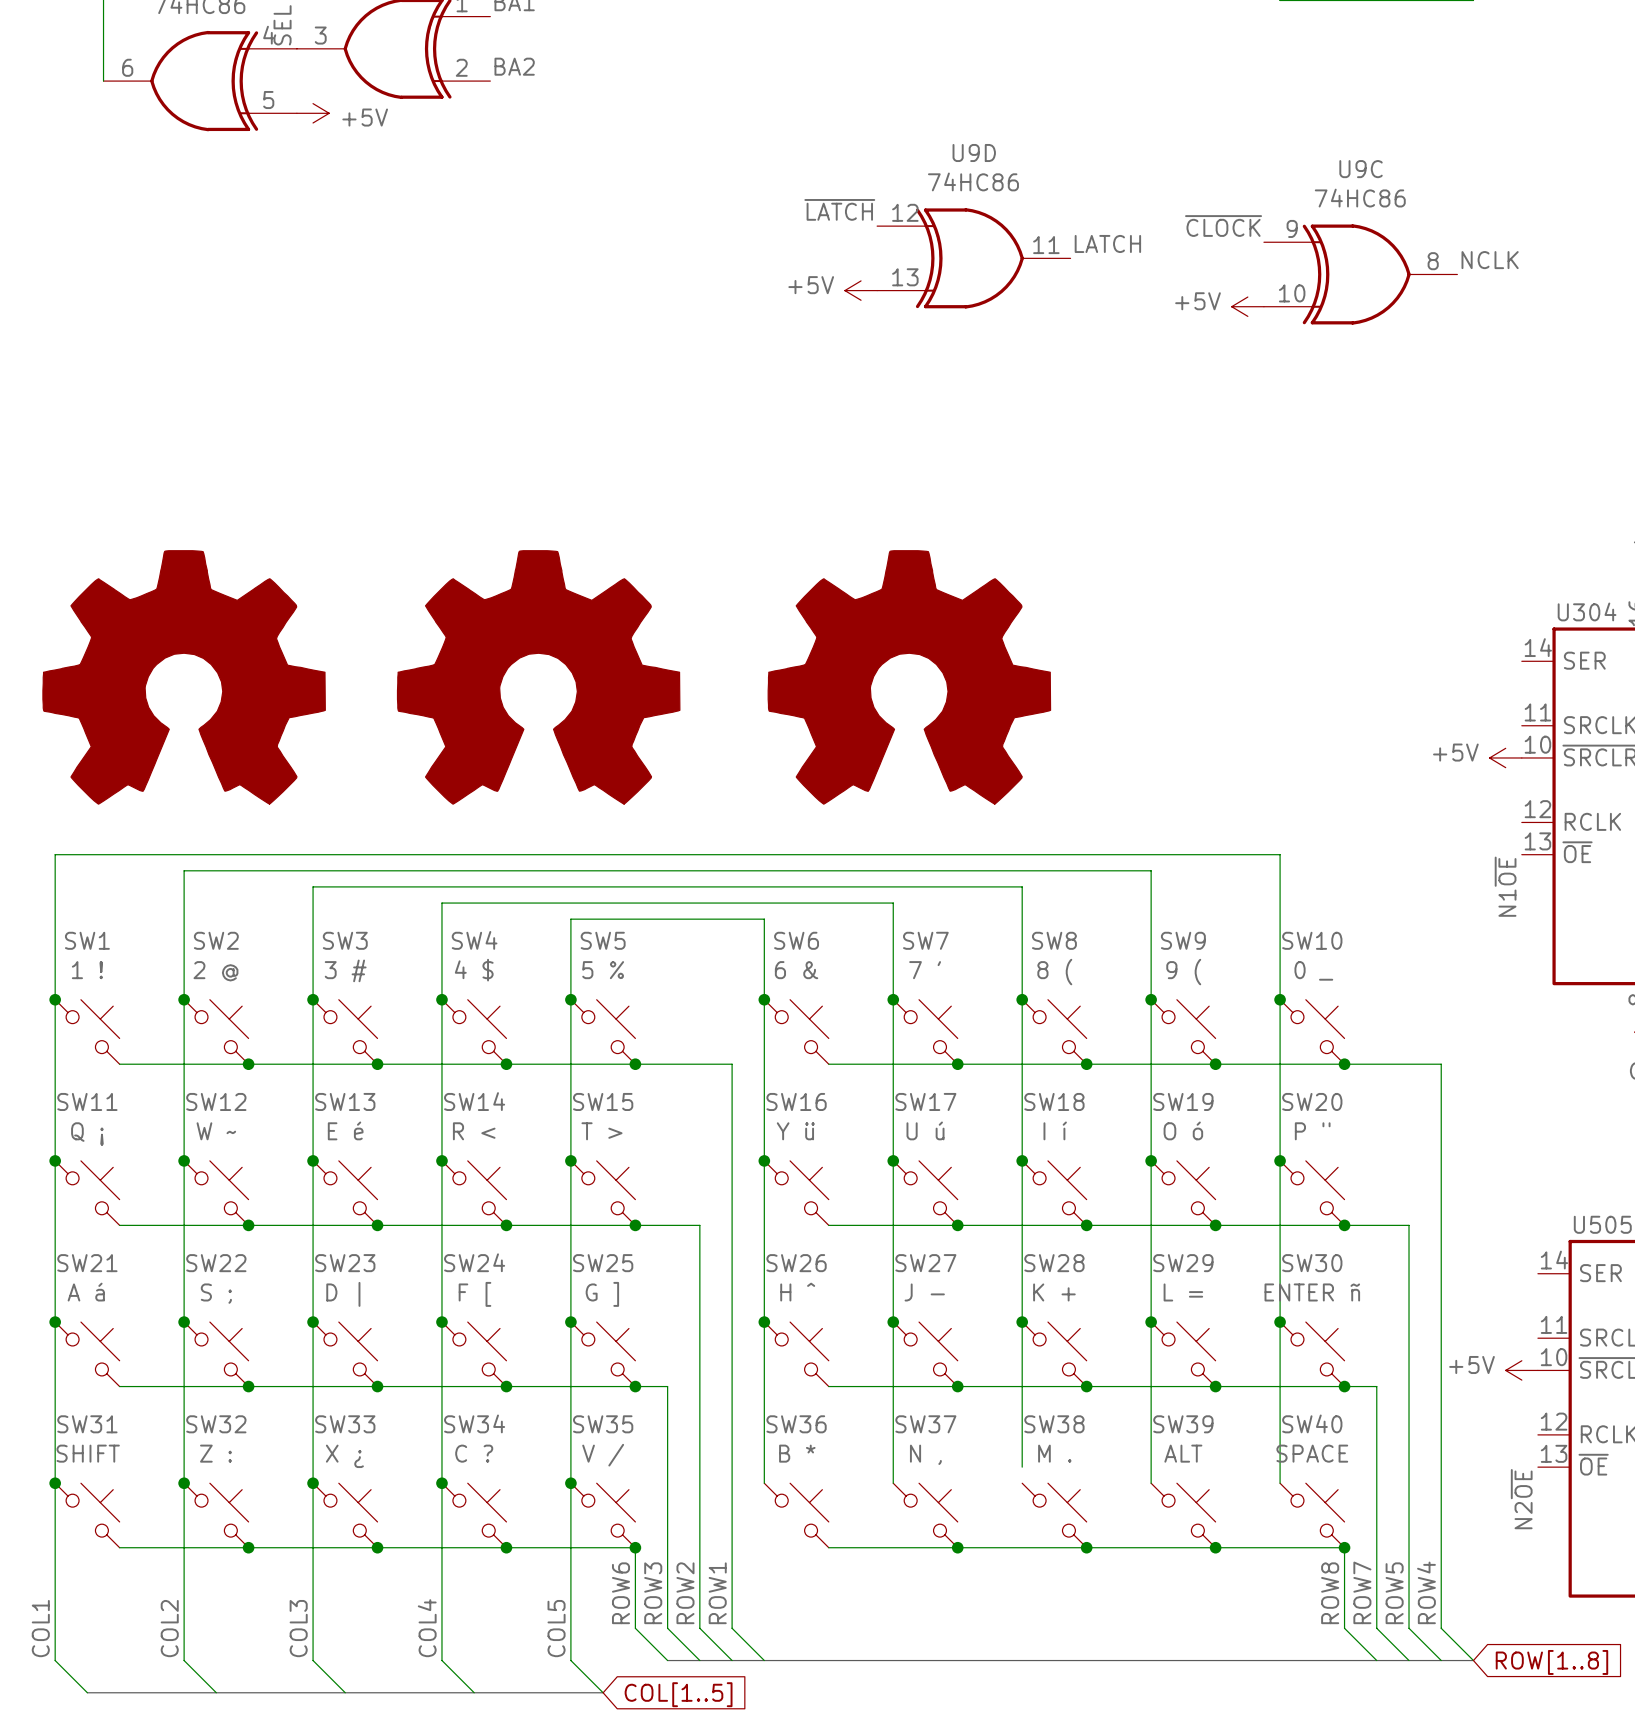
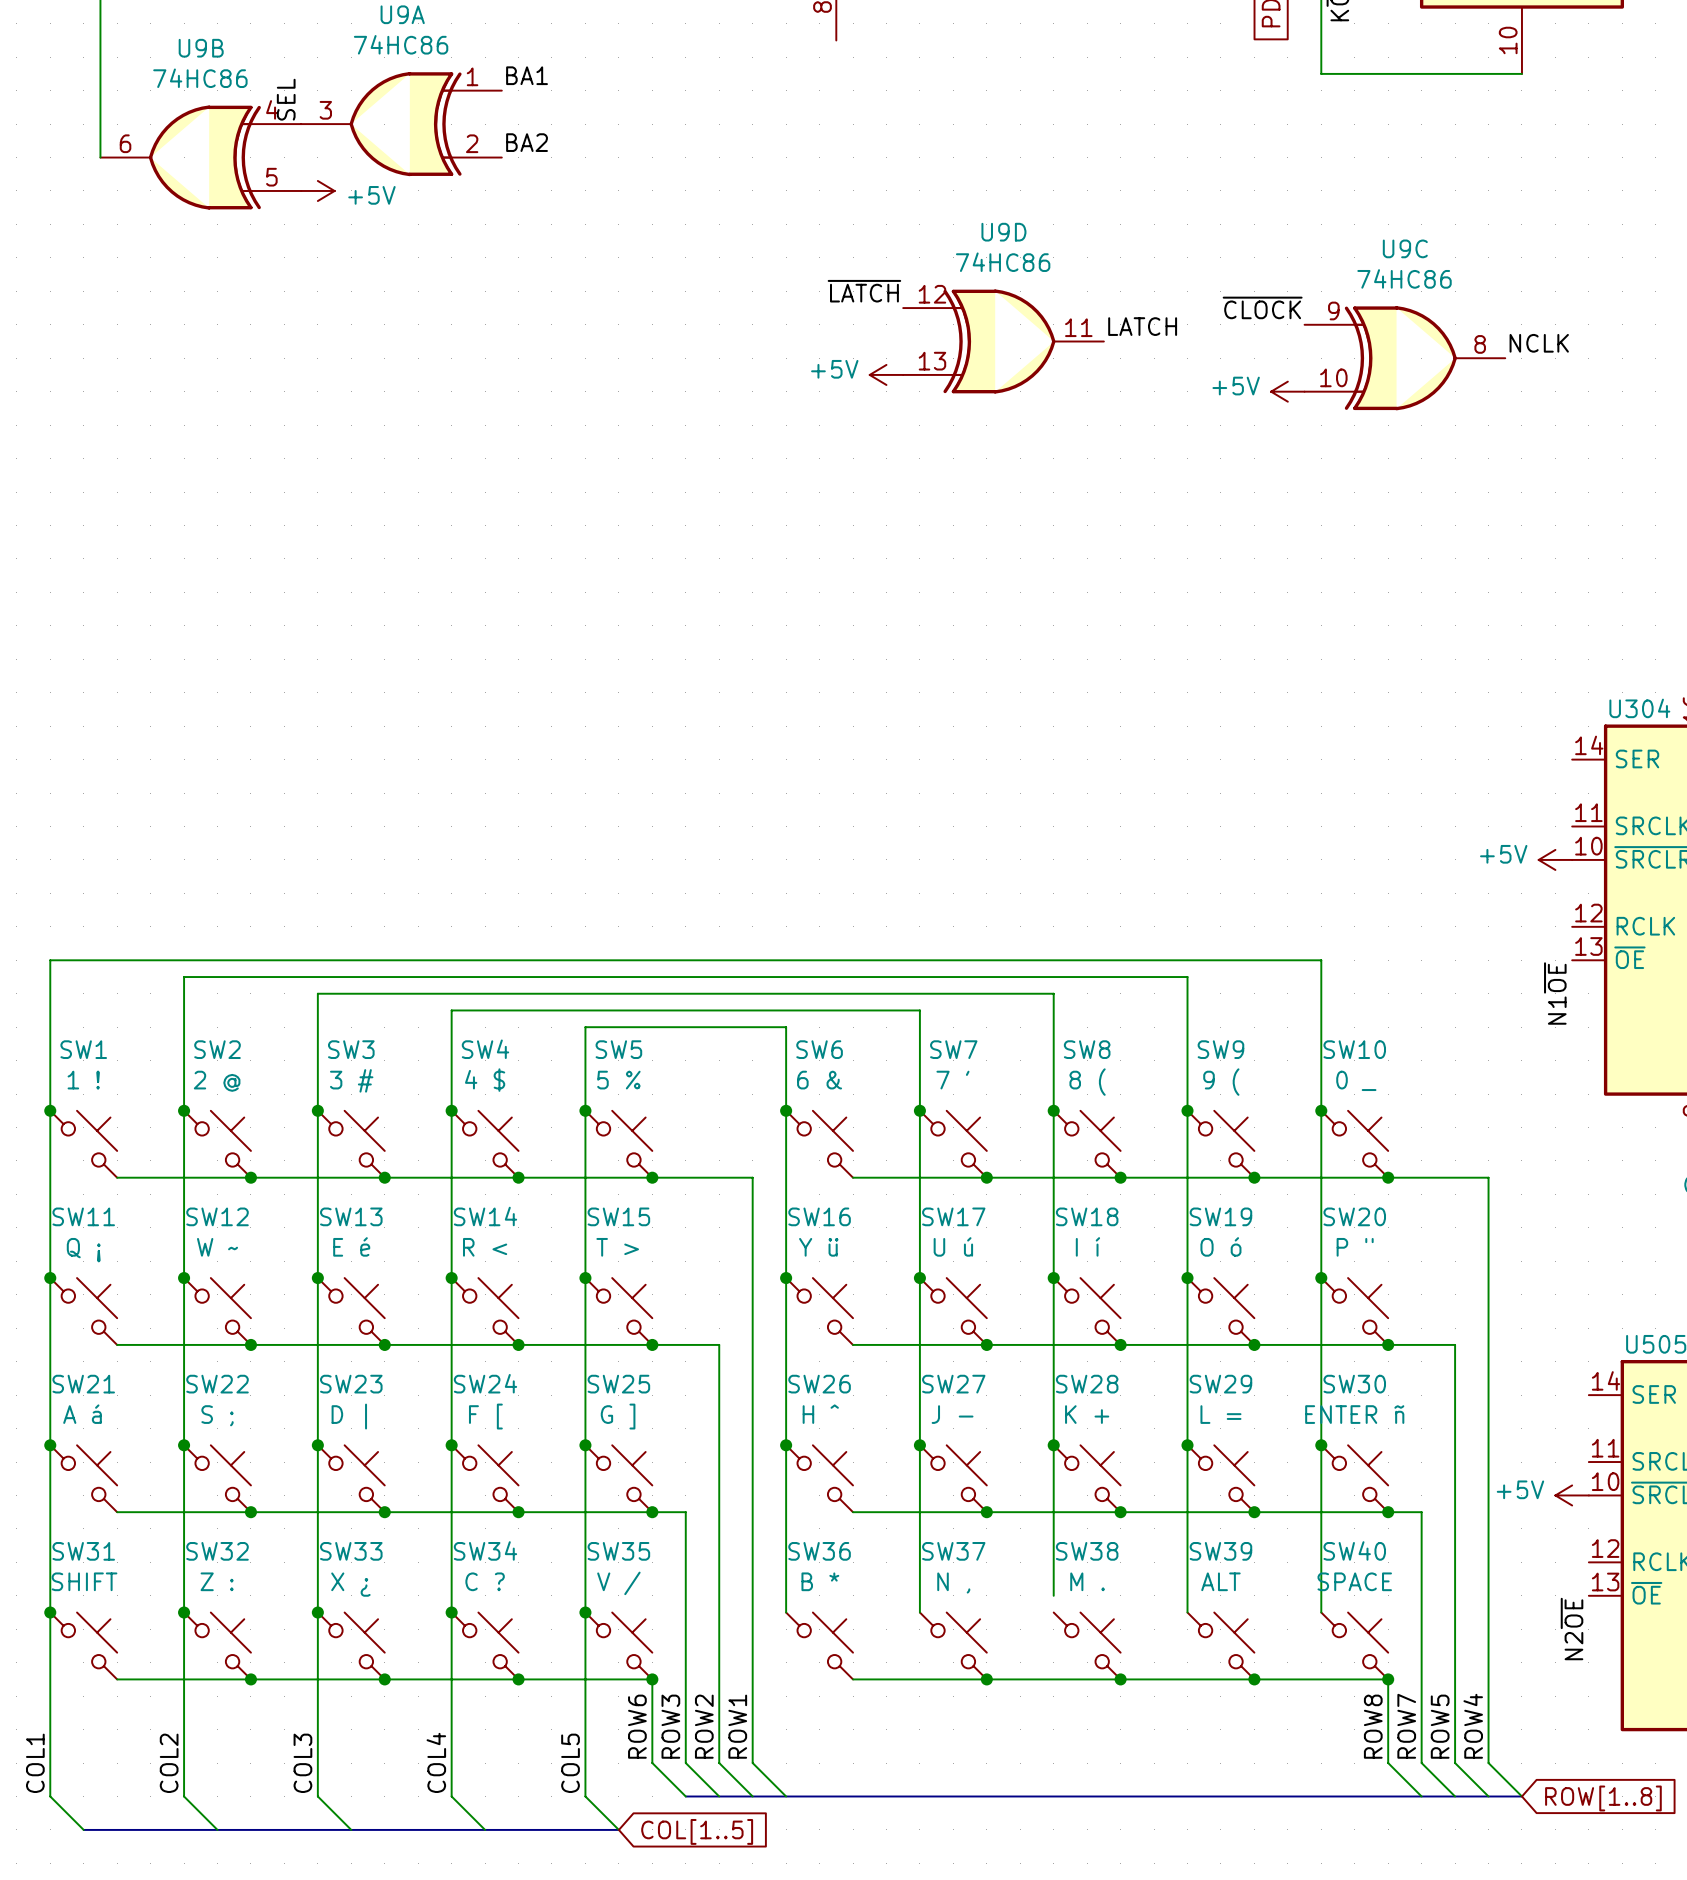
part: (184, 677) -> none
part: (538, 677) -> none
part: (909, 677) -> none

